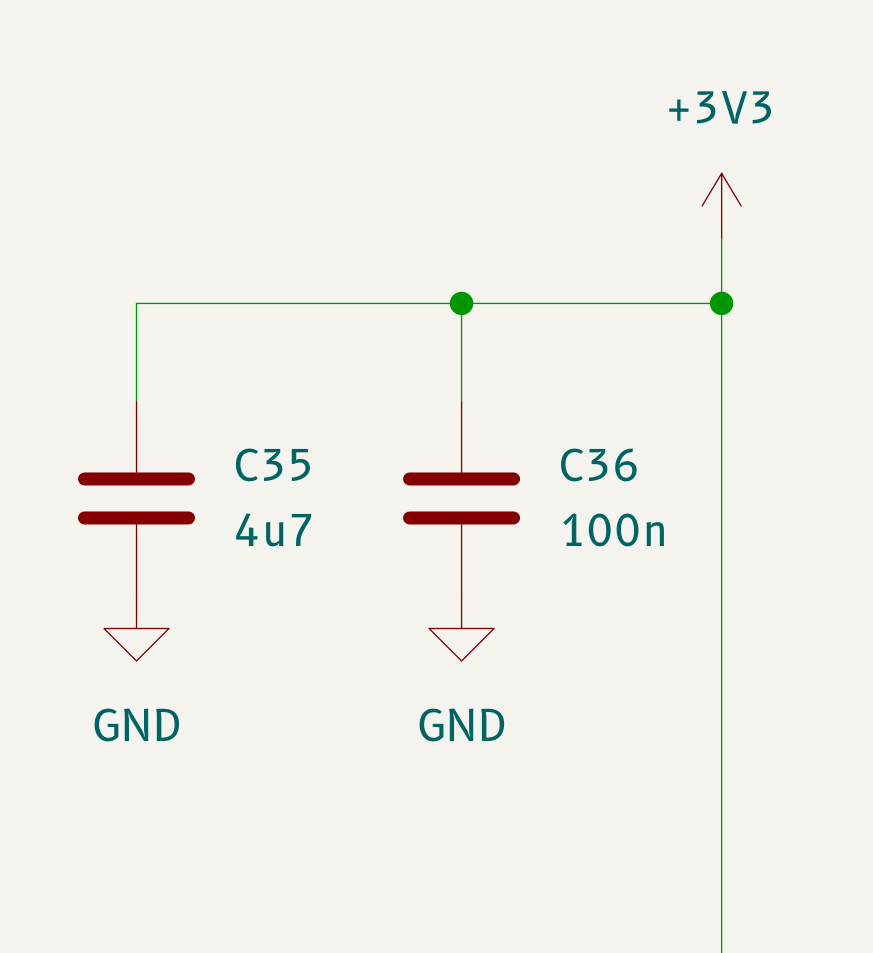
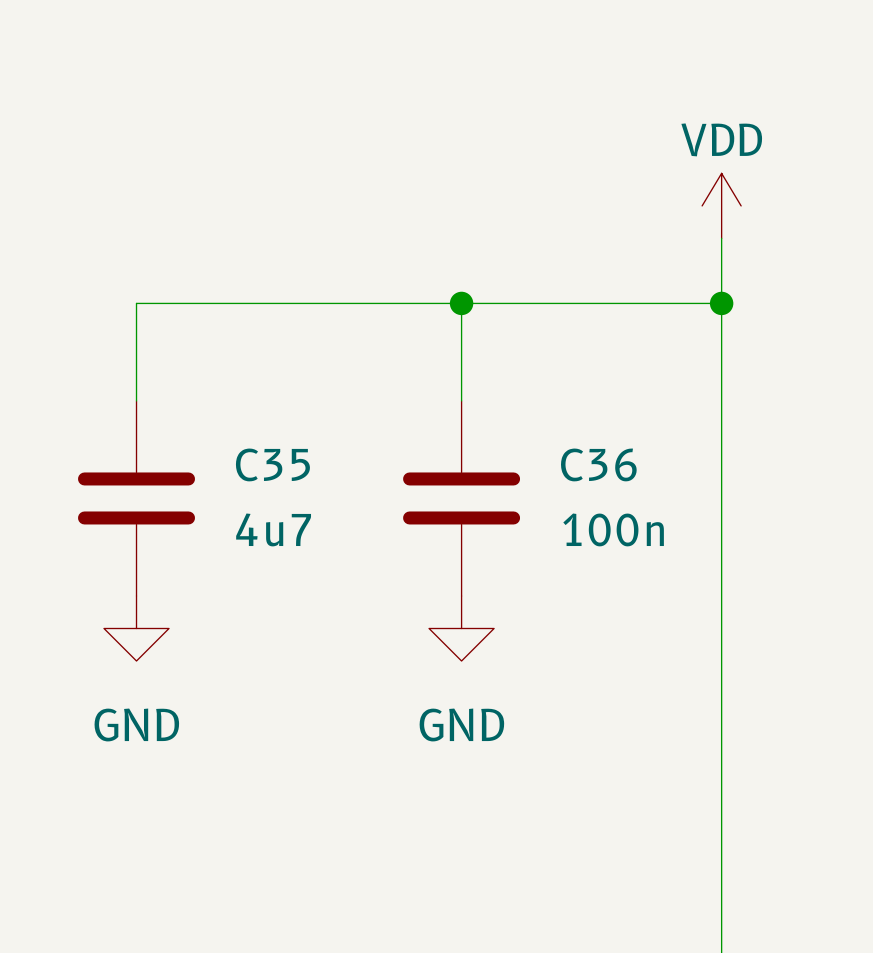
power symbol: +3V3 (721, 205) -> VDD (721, 205)

